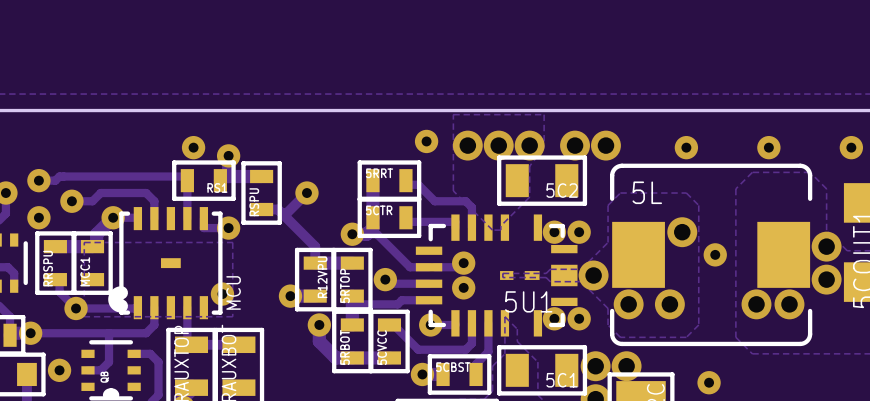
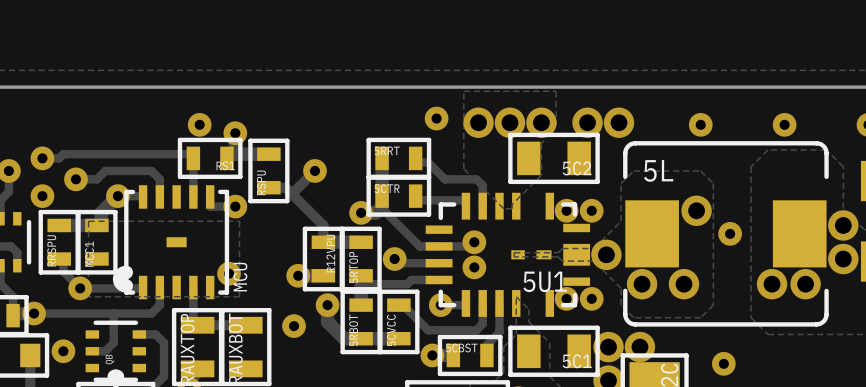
via: none -> (294, 326)

